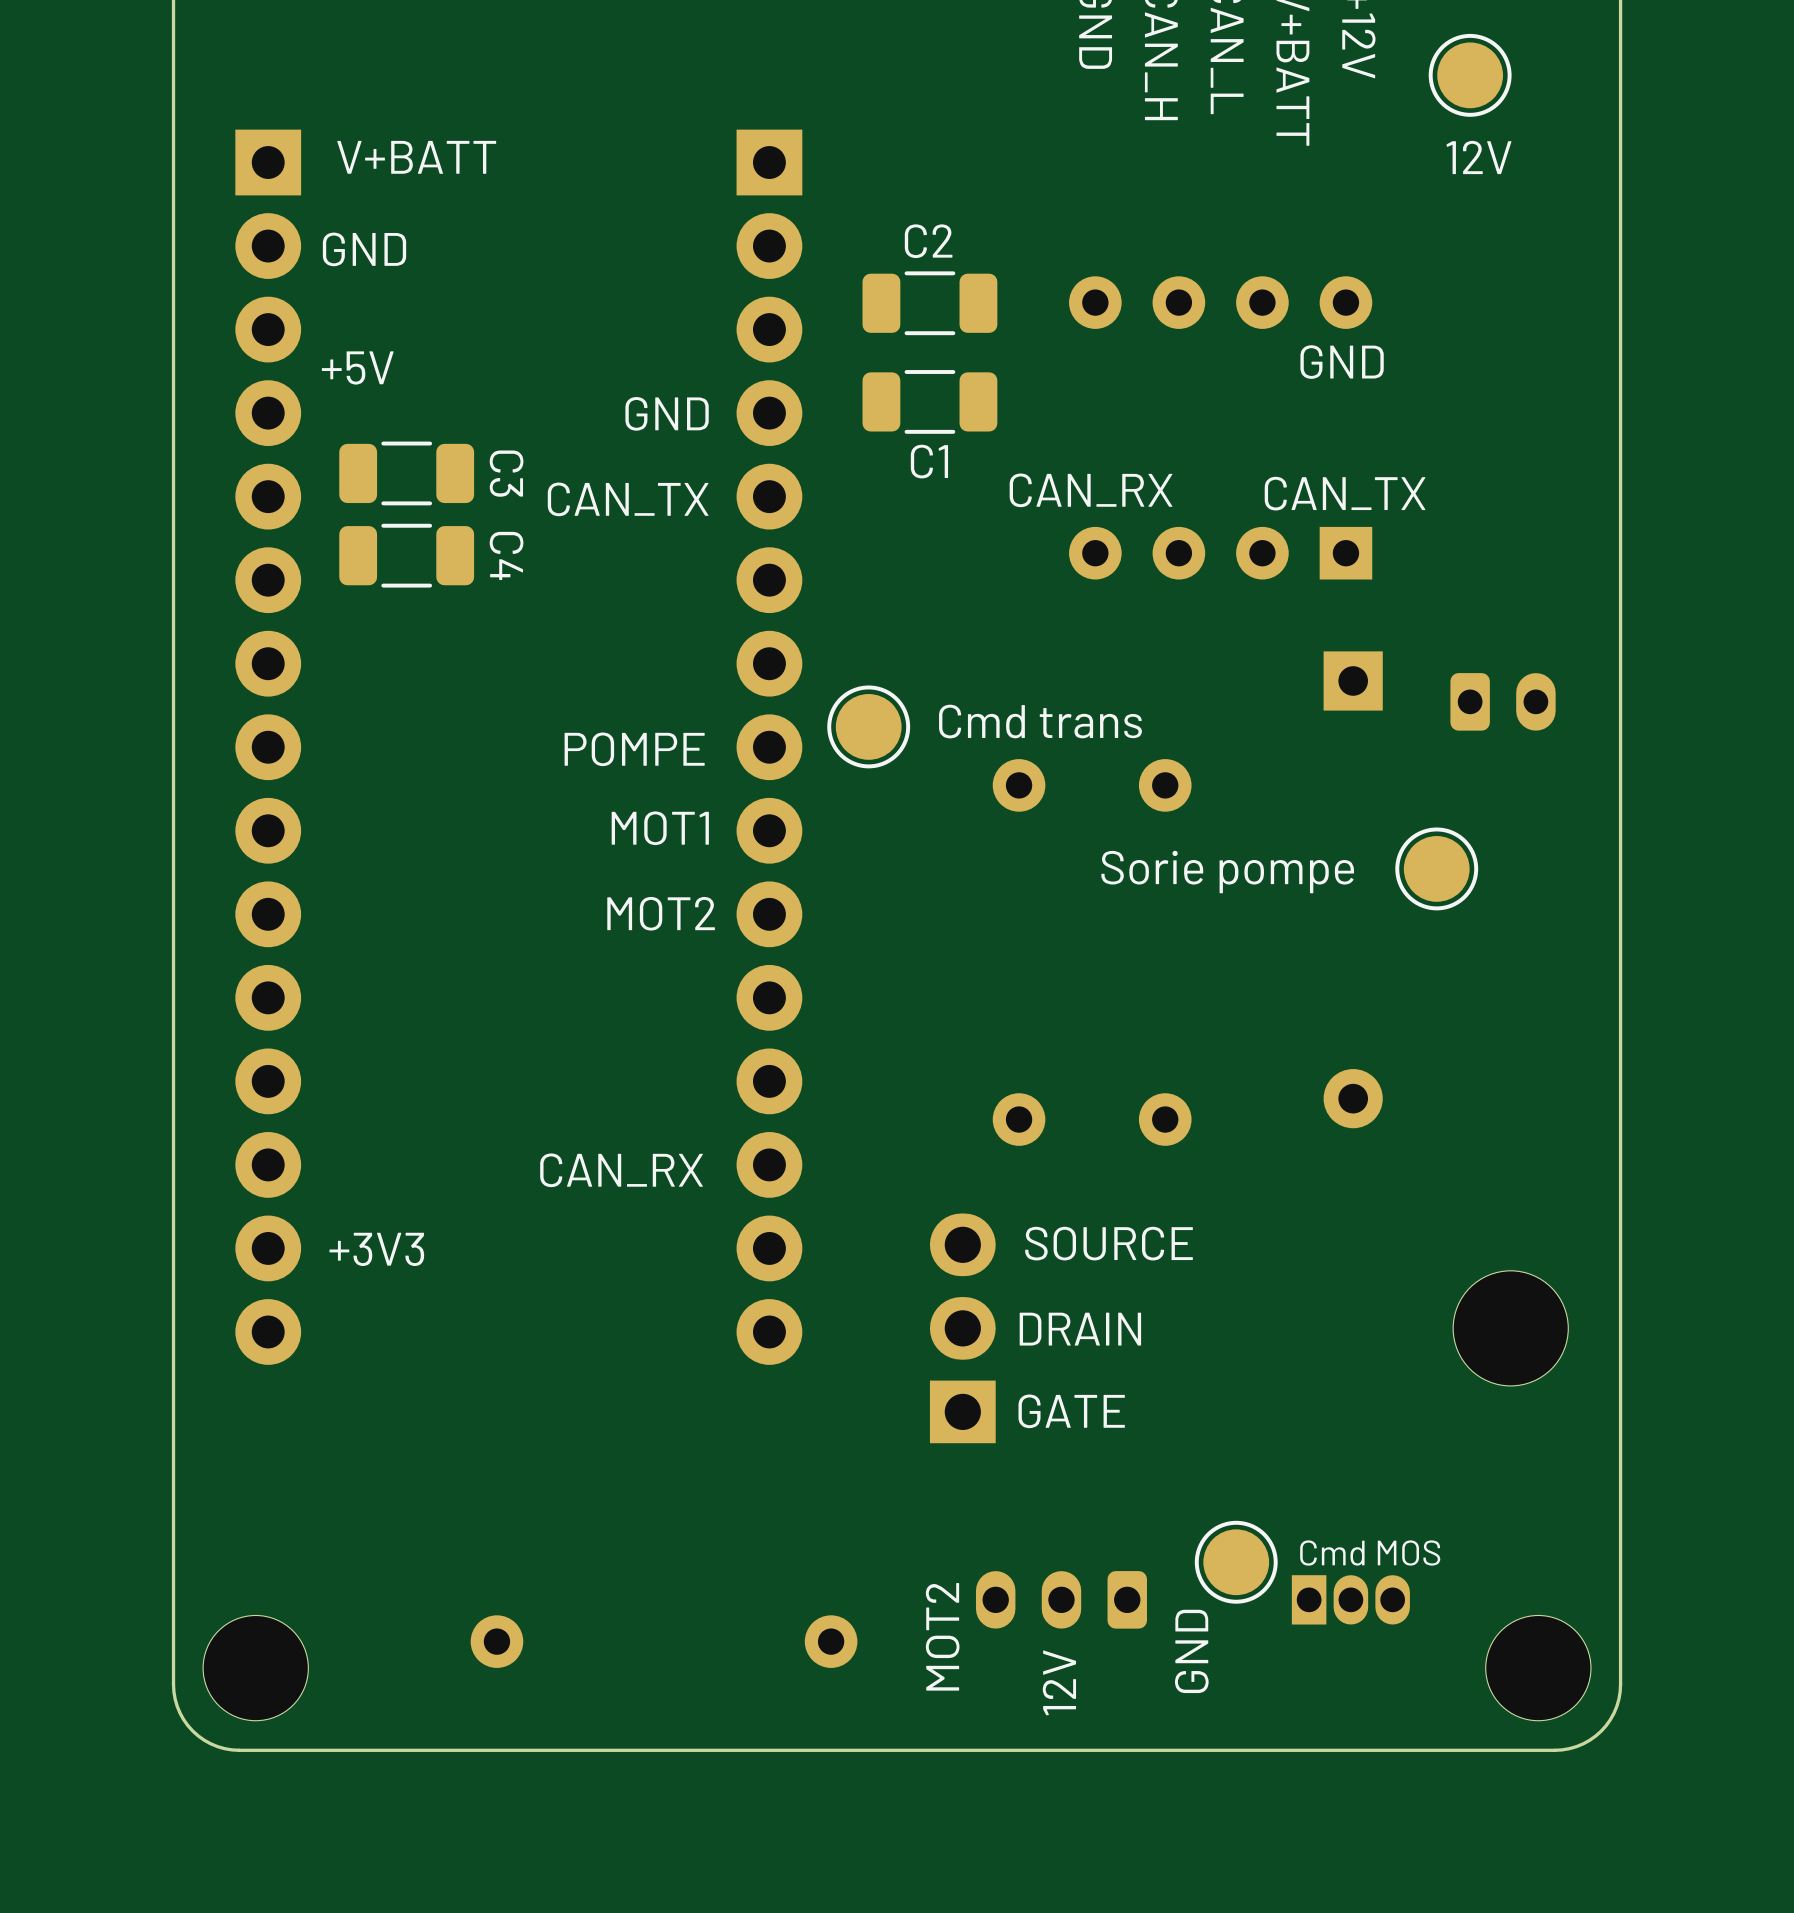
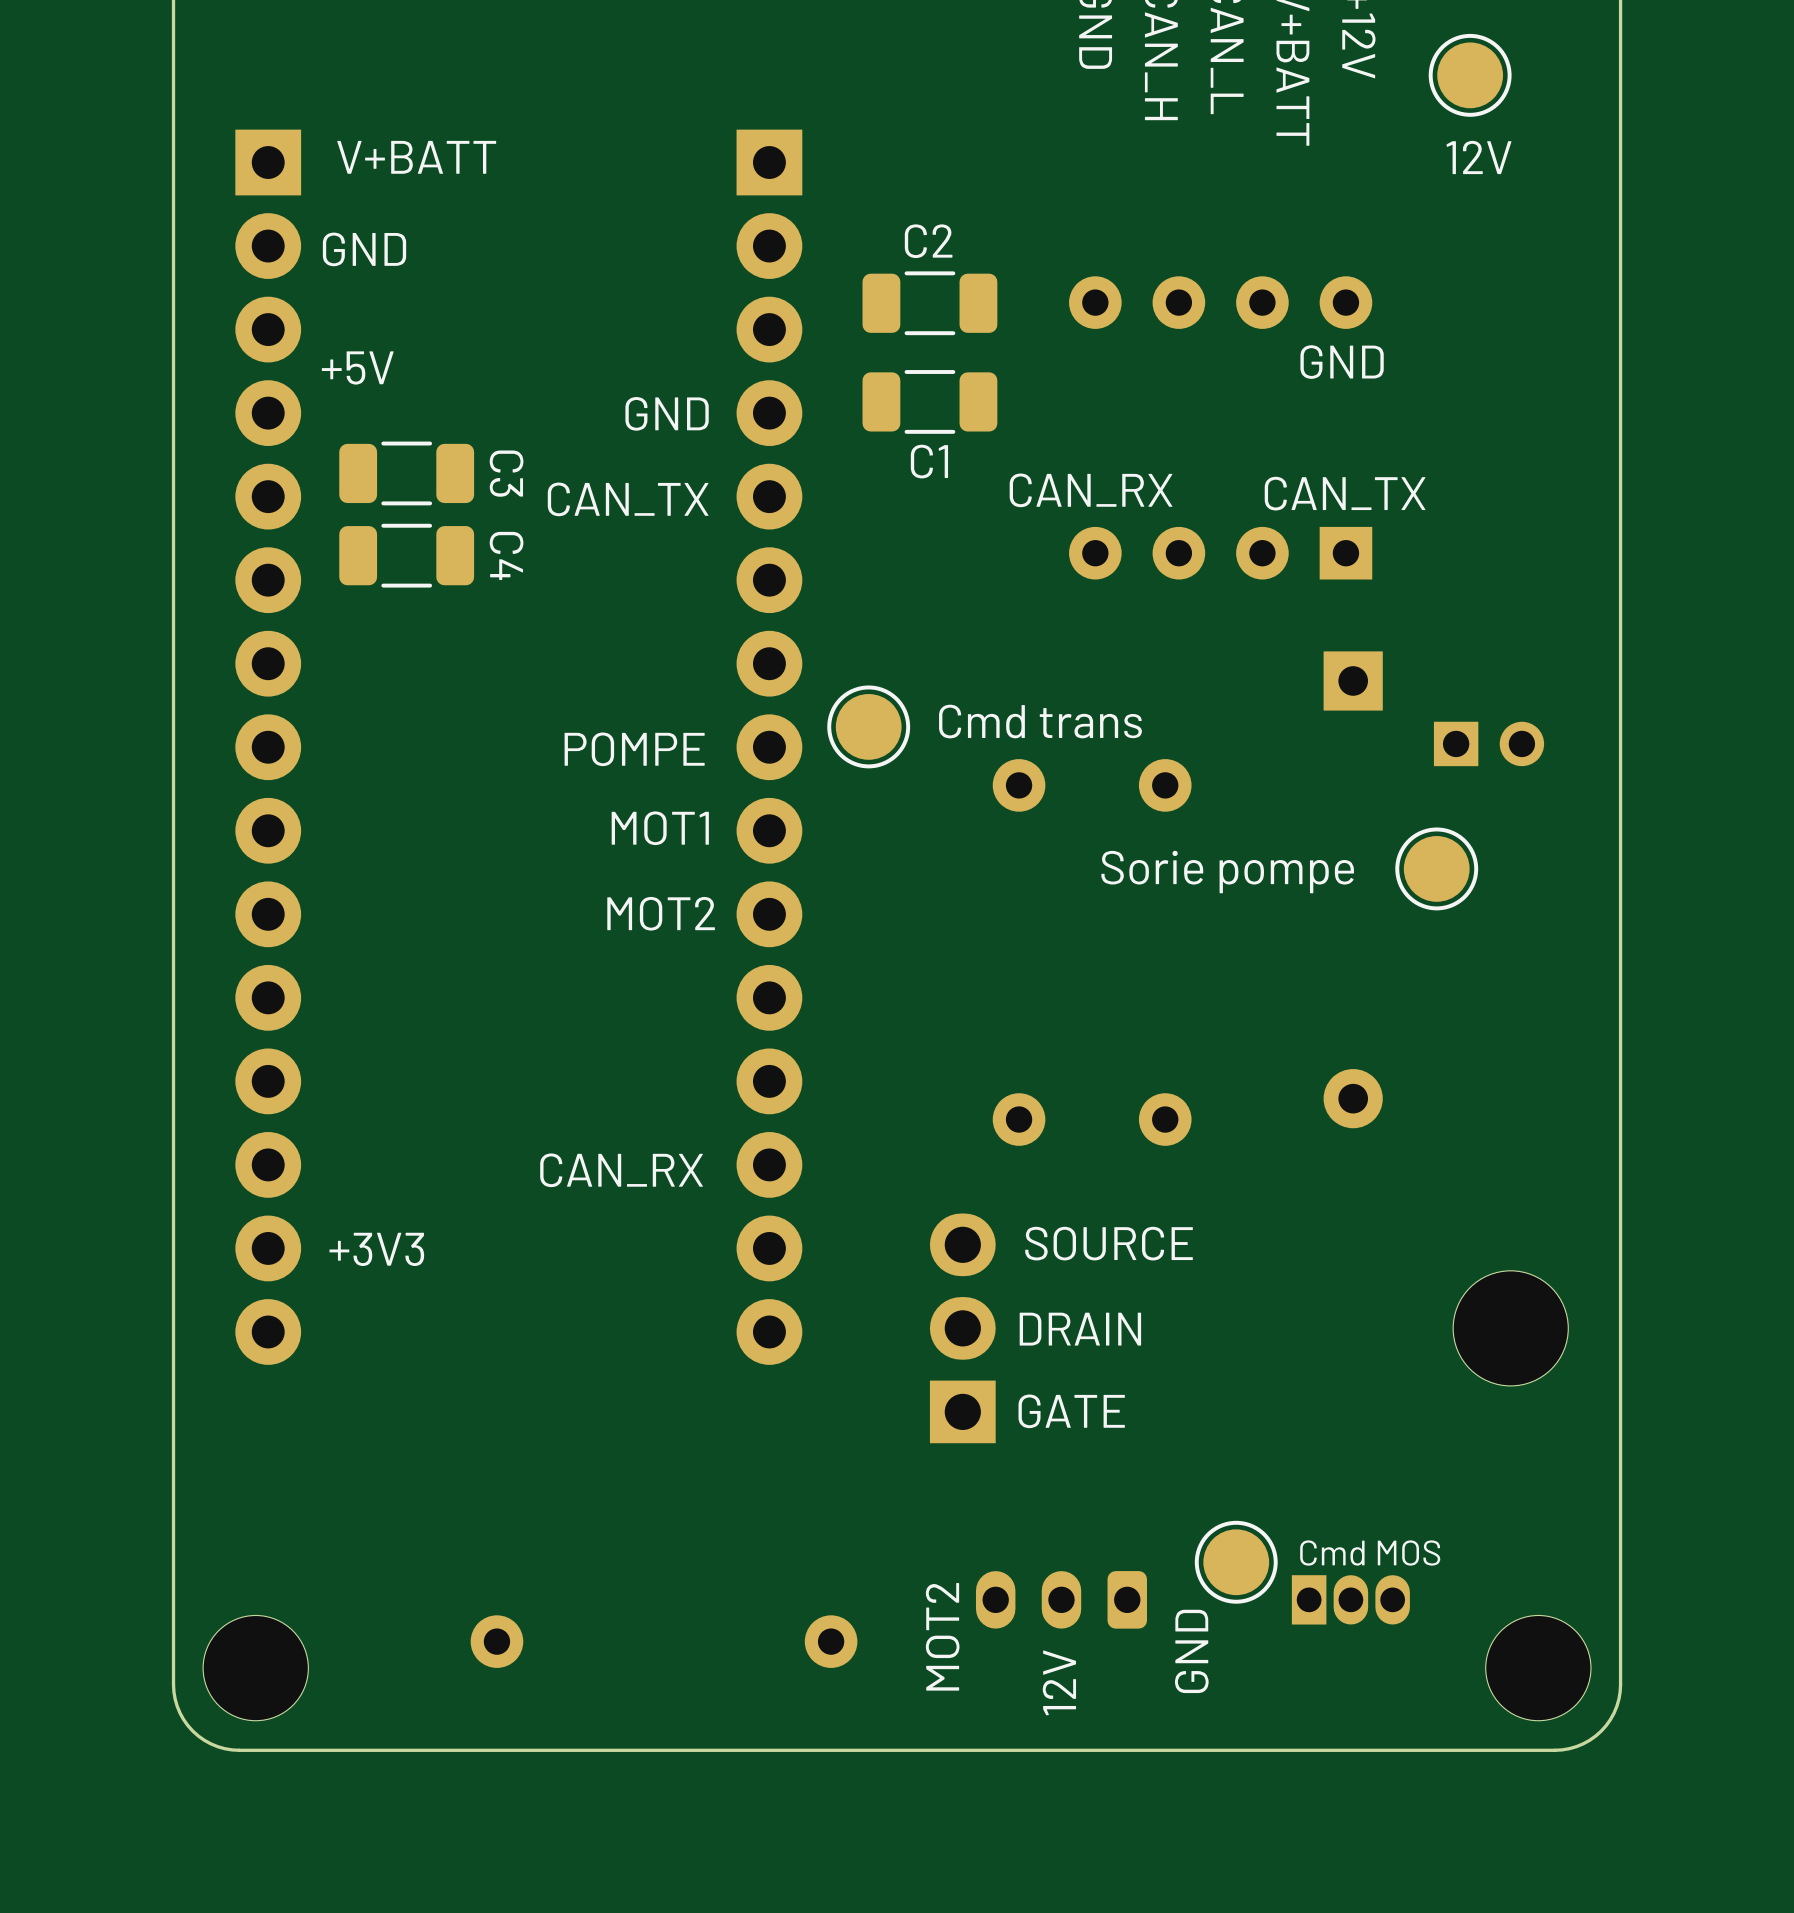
part: (1503, 701) -> none
part: none -> (1489, 743)

